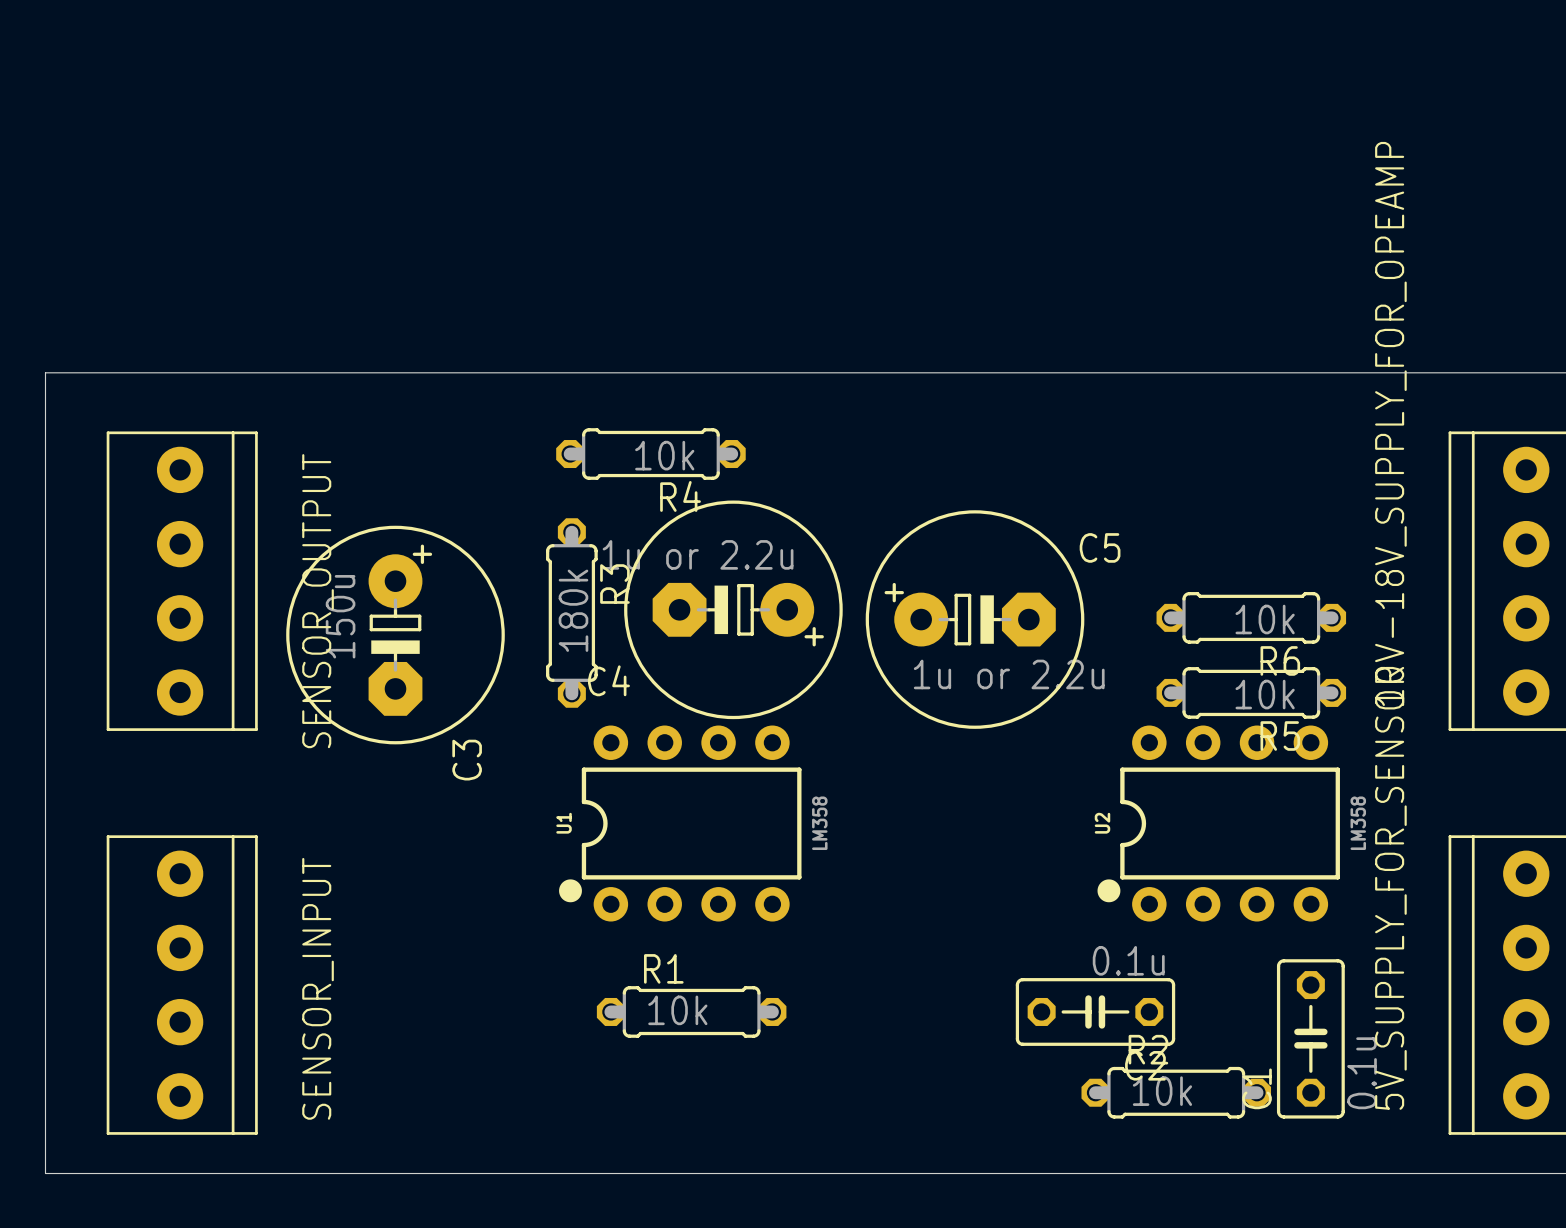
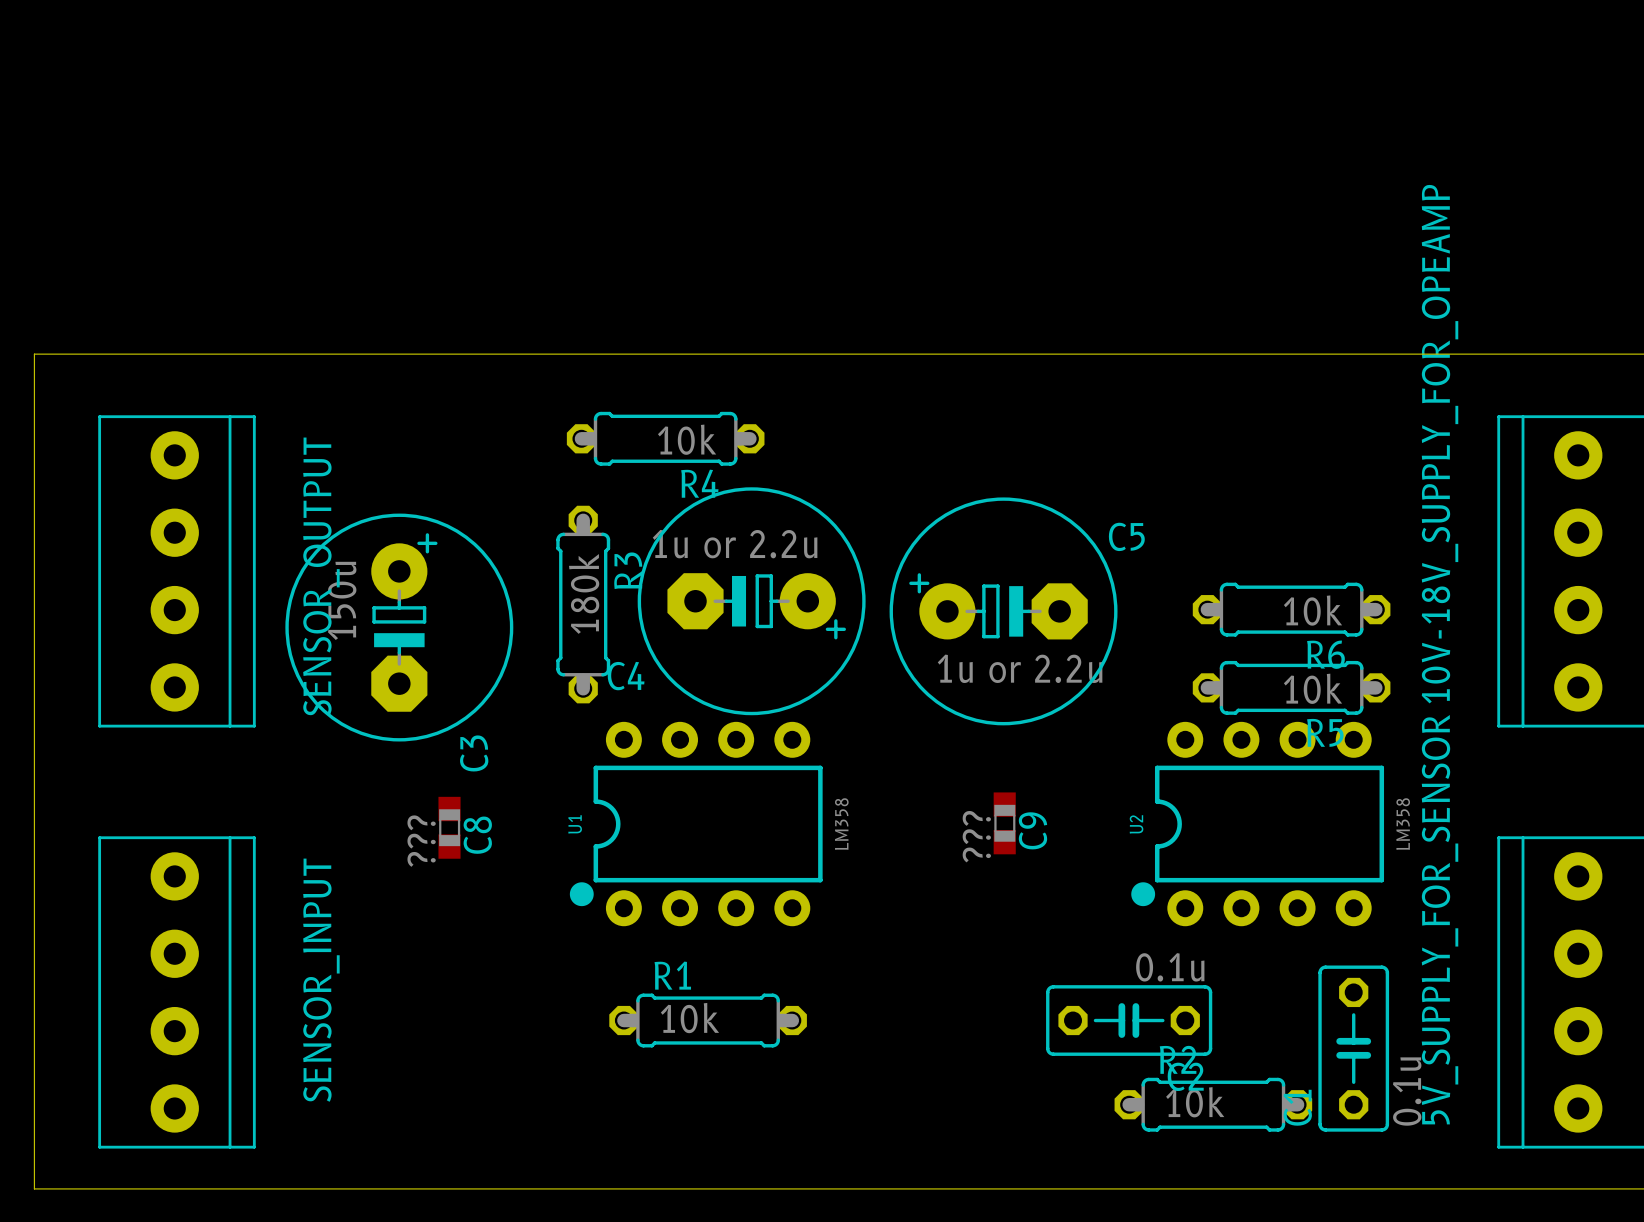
C9: none -> ??? (1004, 823)
C8: none -> ??? (449, 827)

